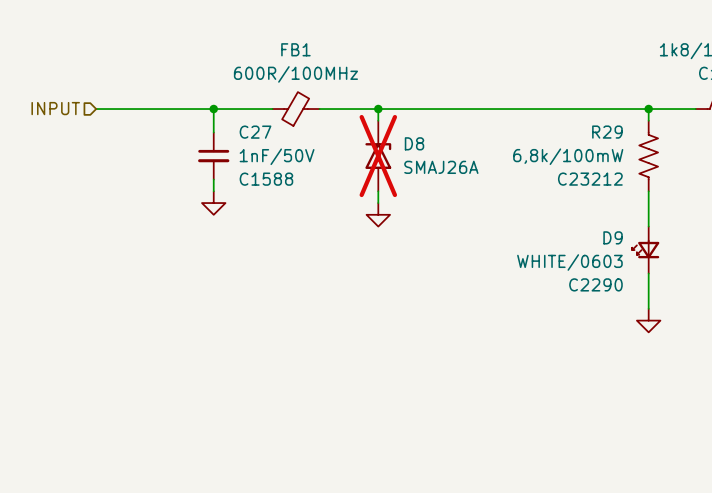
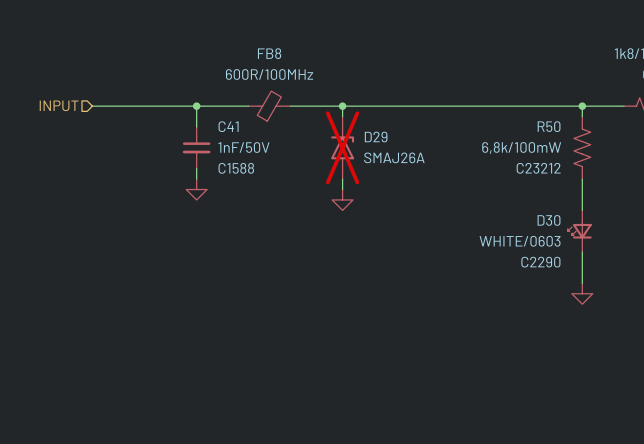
FB1 name: FB1 (295, 49) -> FB8 (269, 53)
C27 name: C27 (255, 132) -> C41 (228, 126)
R29 name: R29 (607, 132) -> R50 (549, 126)
D8 name: D8 (414, 143) -> D29 (376, 137)
D9 name: D9 (613, 237) -> D30 (549, 220)

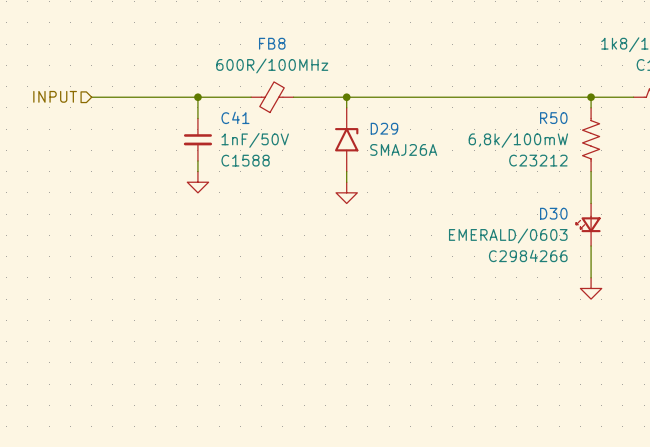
D29 do-not-place cross: (342, 147) -> none
D30 value: WHITE/0603 (520, 241) -> EMERALD/0603 (508, 235)
D30 text: C2290 (540, 262) -> C2984266 (528, 255)

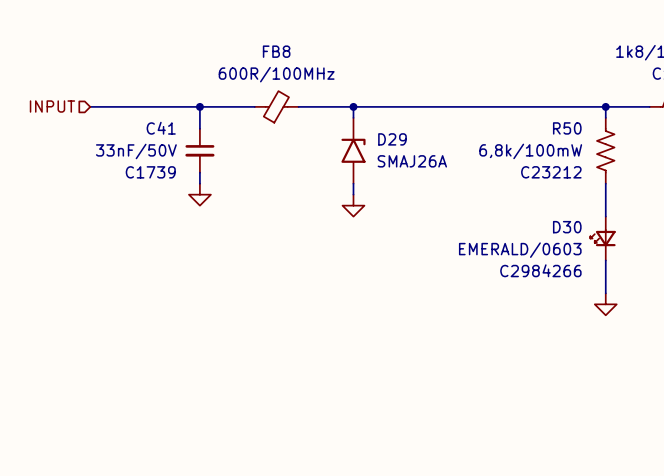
C41 name position: C41 (235, 117) -> C41 (161, 128)
C41 value: 1nF/50V (255, 140) -> 33nF/50V (136, 151)
C41 text: C1588 (245, 160) -> C1739 (150, 172)

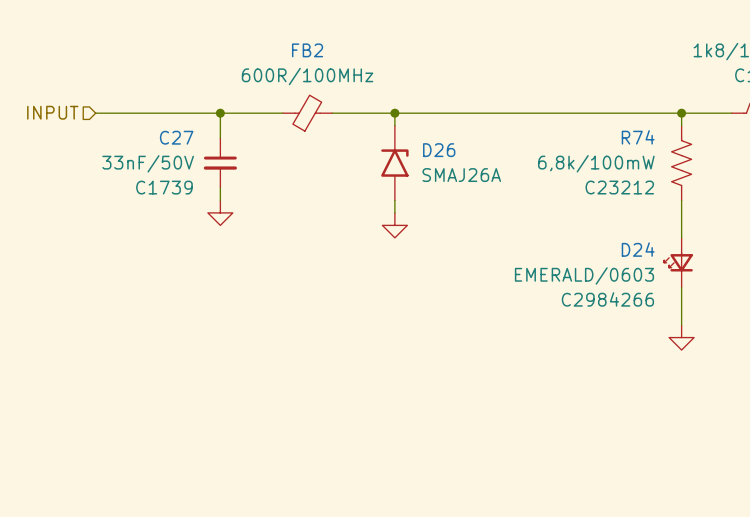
FB8 name: FB8 (276, 51) -> FB2 (307, 50)
C41 name: C41 (161, 128) -> C27 (176, 137)
R50 name: R50 (567, 128) -> R74 (638, 137)
D29 name: D29 (392, 139) -> D26 (439, 150)
D30 name: D30 (567, 227) -> D24 (638, 249)

